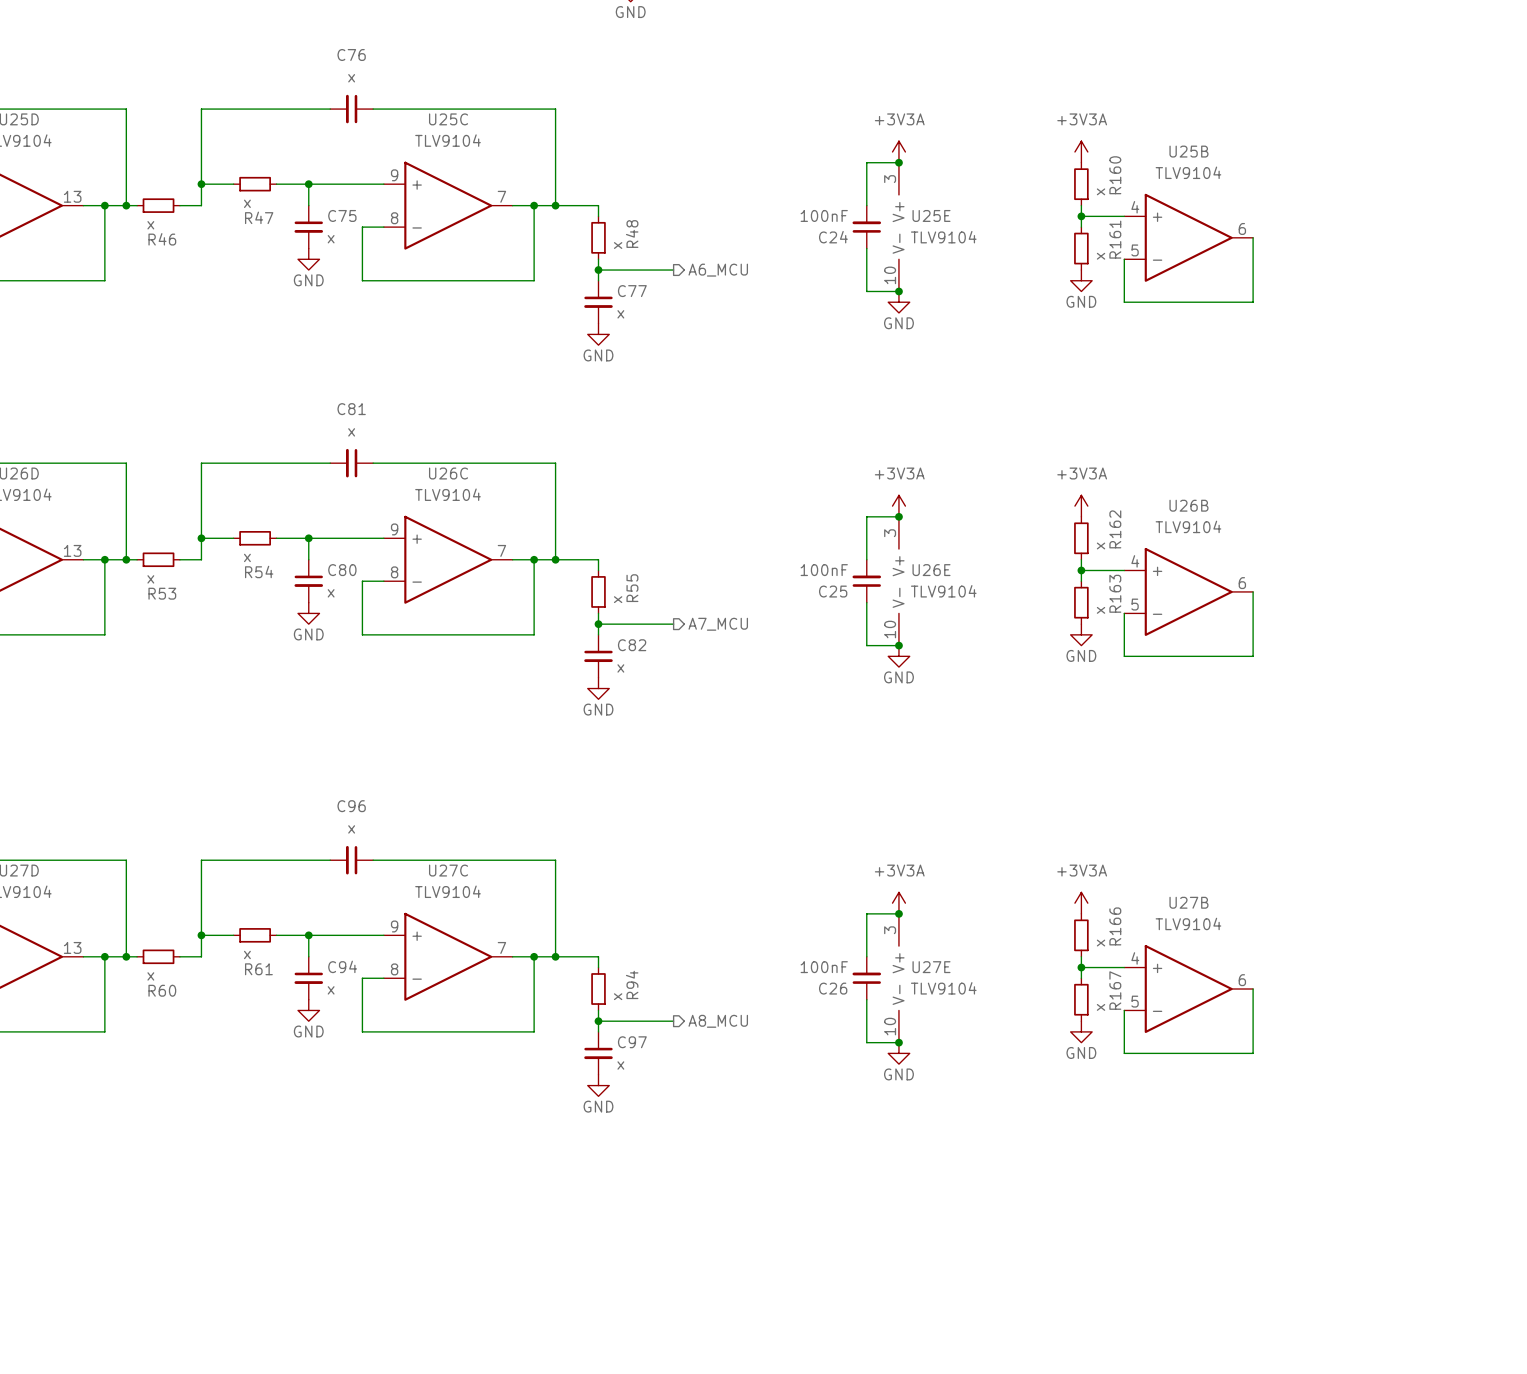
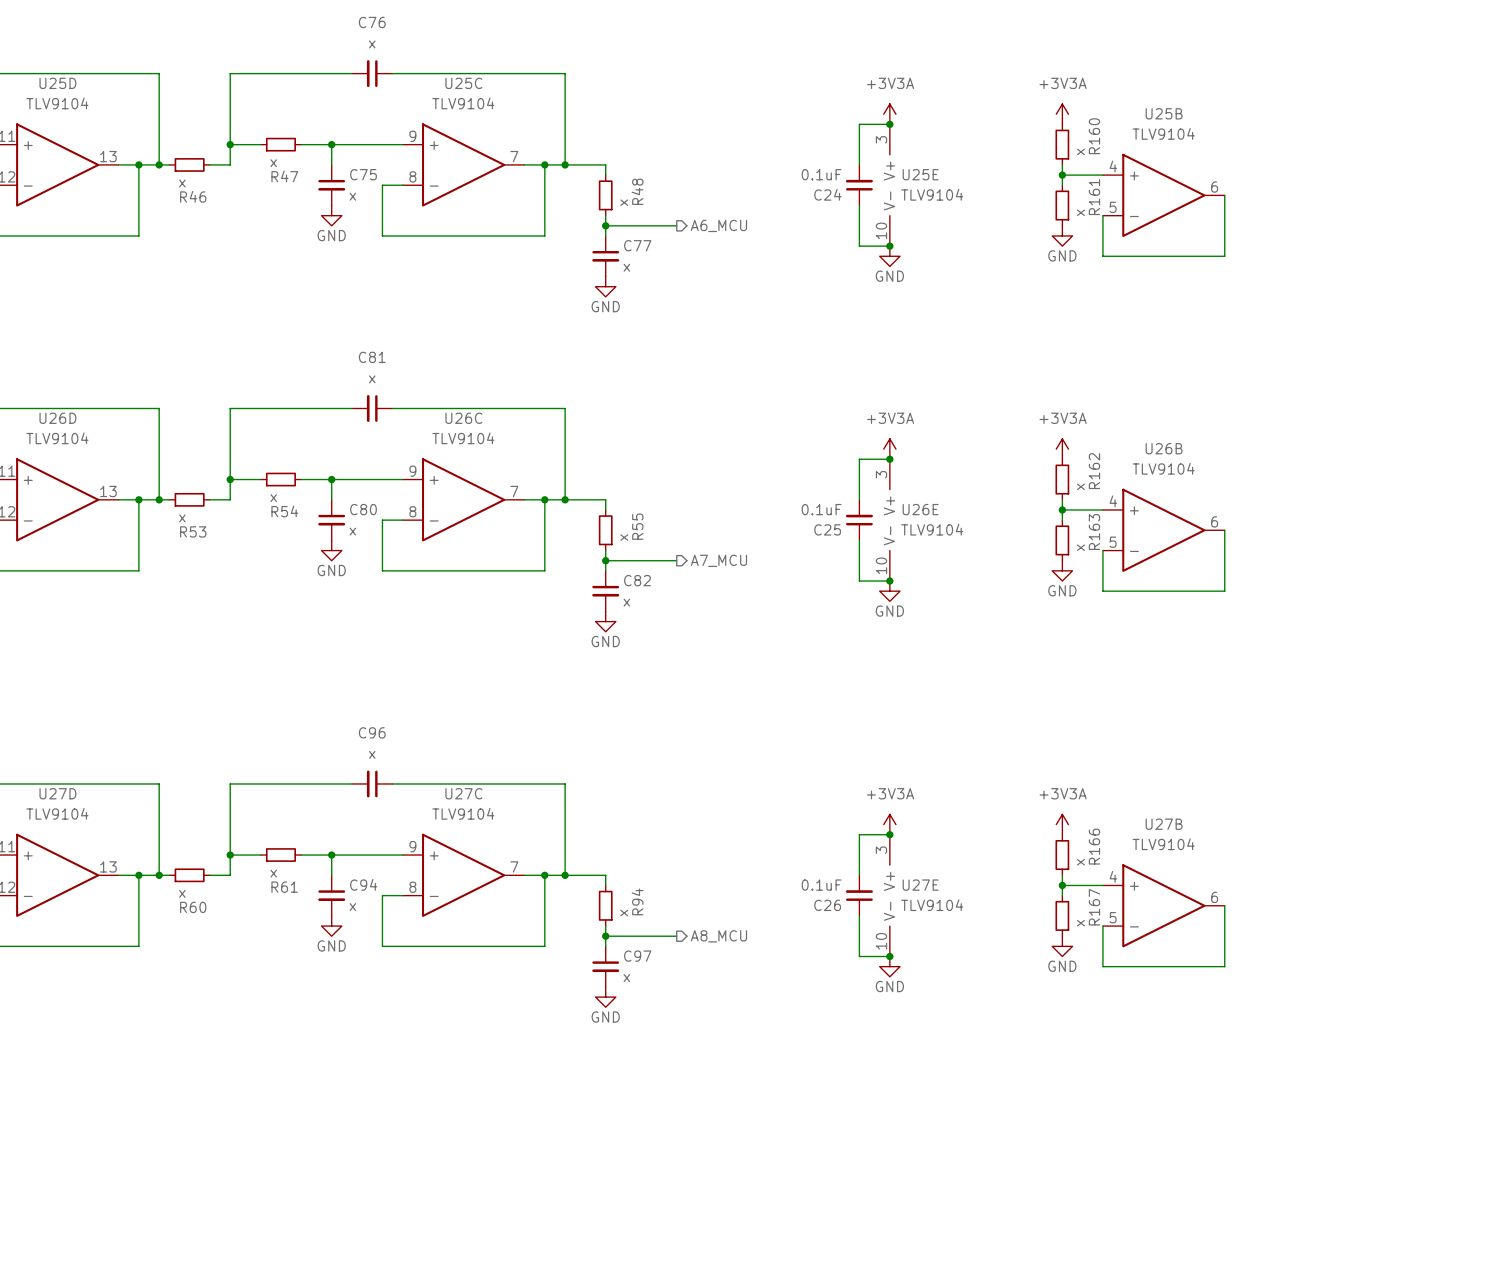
C24 value: 100nF (824, 215) -> 0.1uF (821, 174)
C25 value: 100nF (824, 570) -> 0.1uF (821, 509)
C26 value: 100nF (824, 967) -> 0.1uF (821, 885)

